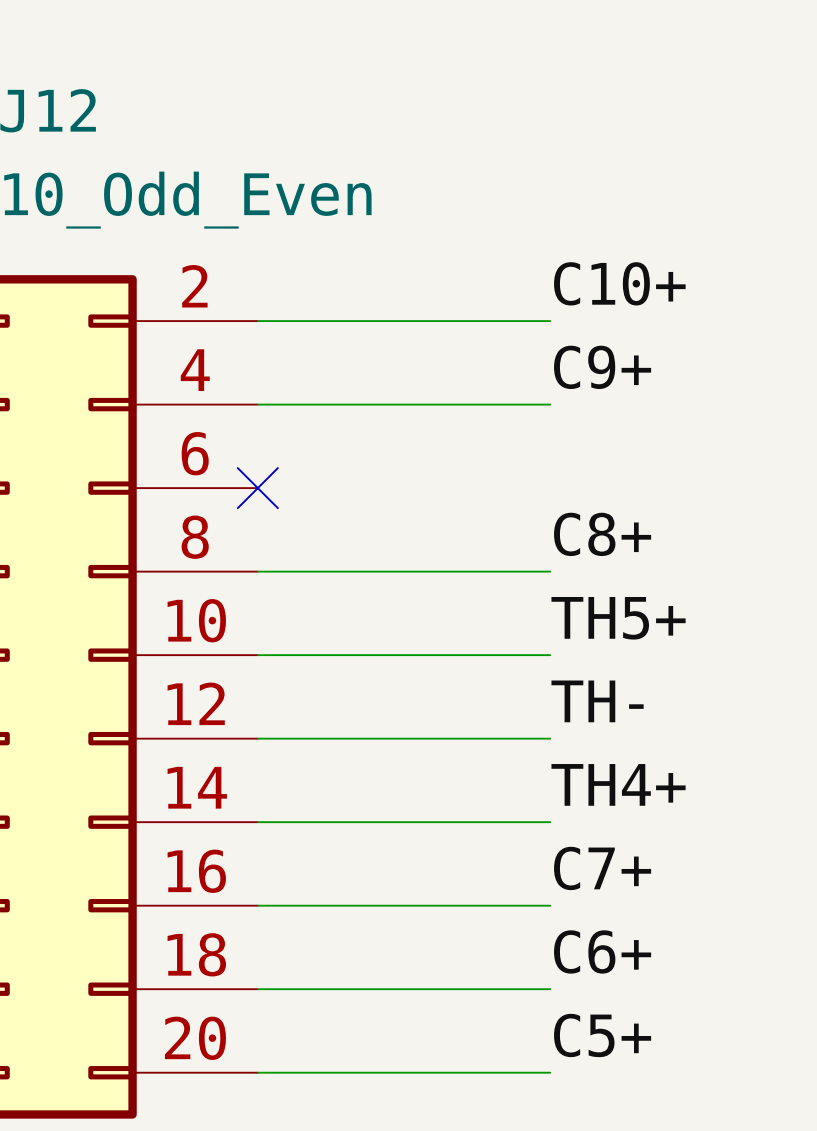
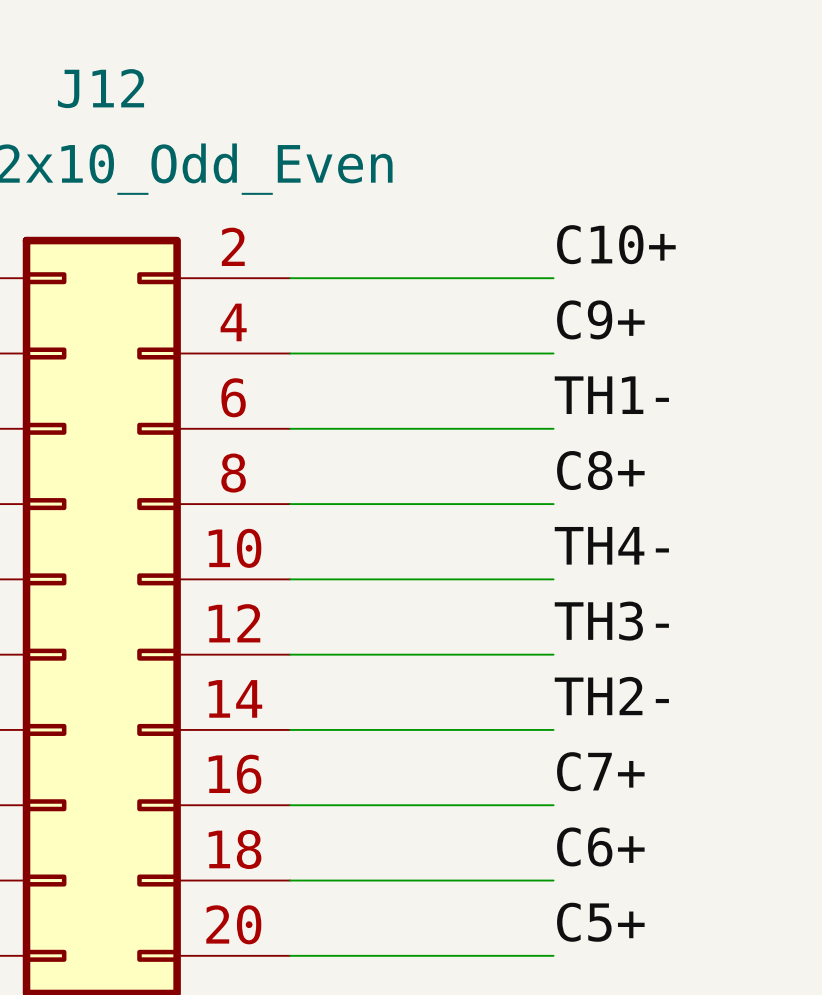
label: none -> TH1- (611, 395)
wire: none -> (290, 428) (553, 428)
no-connect mark: (257, 488) -> none
label: TH5+ (618, 618) -> TH4- (611, 545)
label: TH- (597, 701) -> TH3- (611, 621)
label: TH4+ (618, 784) -> TH2- (611, 696)

